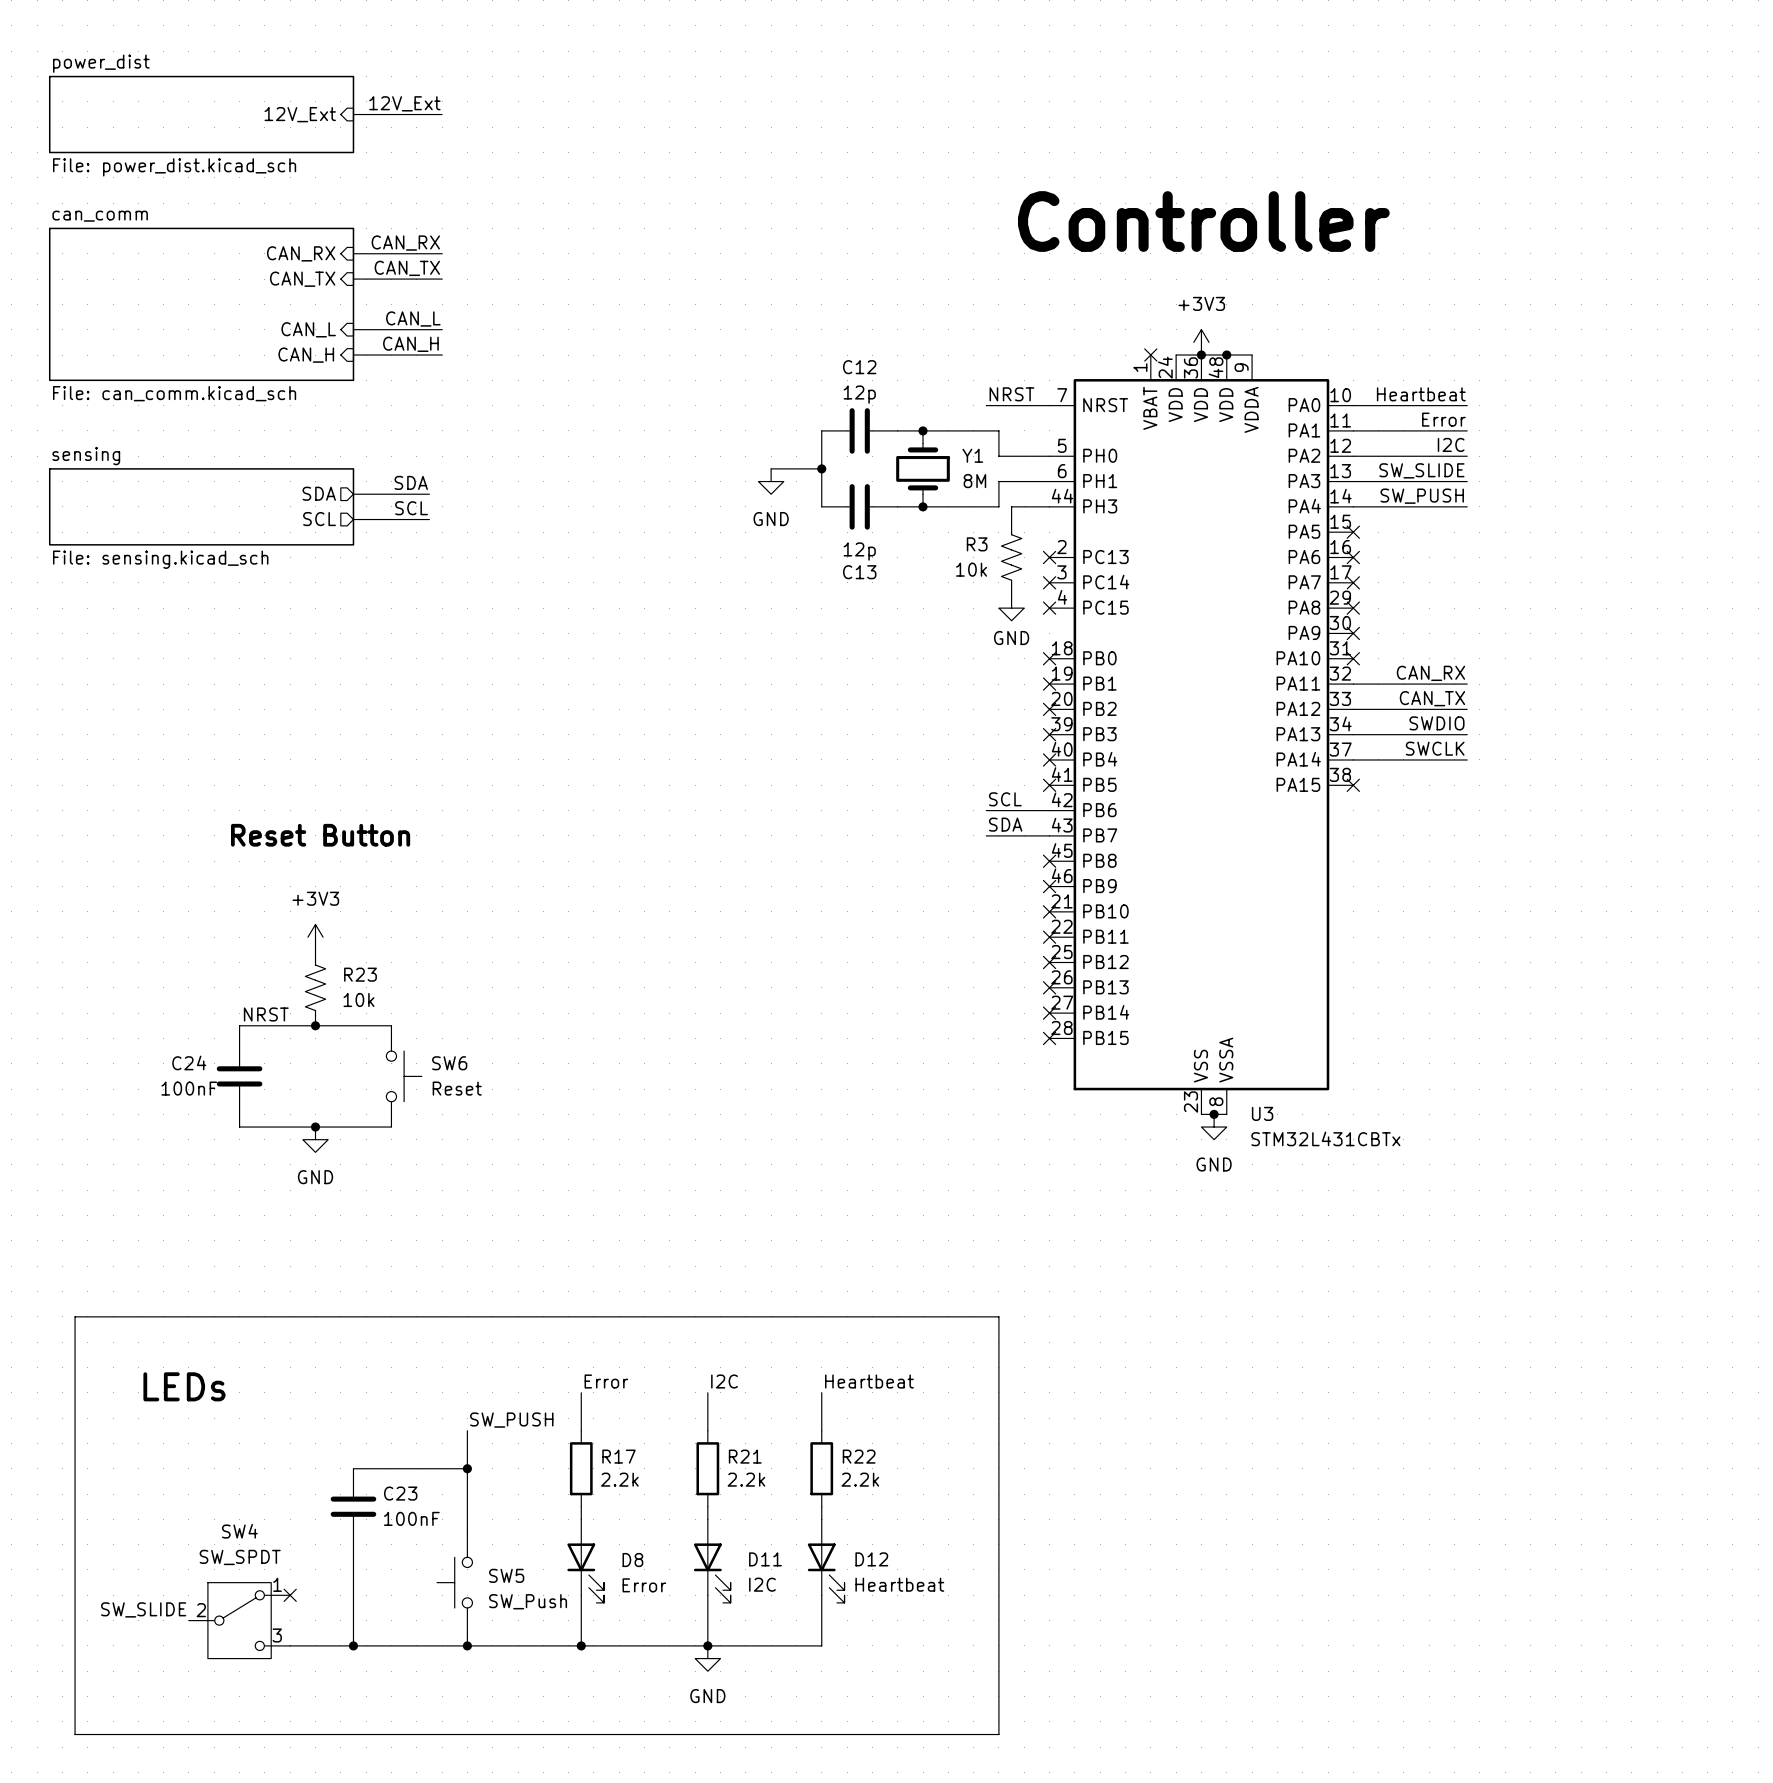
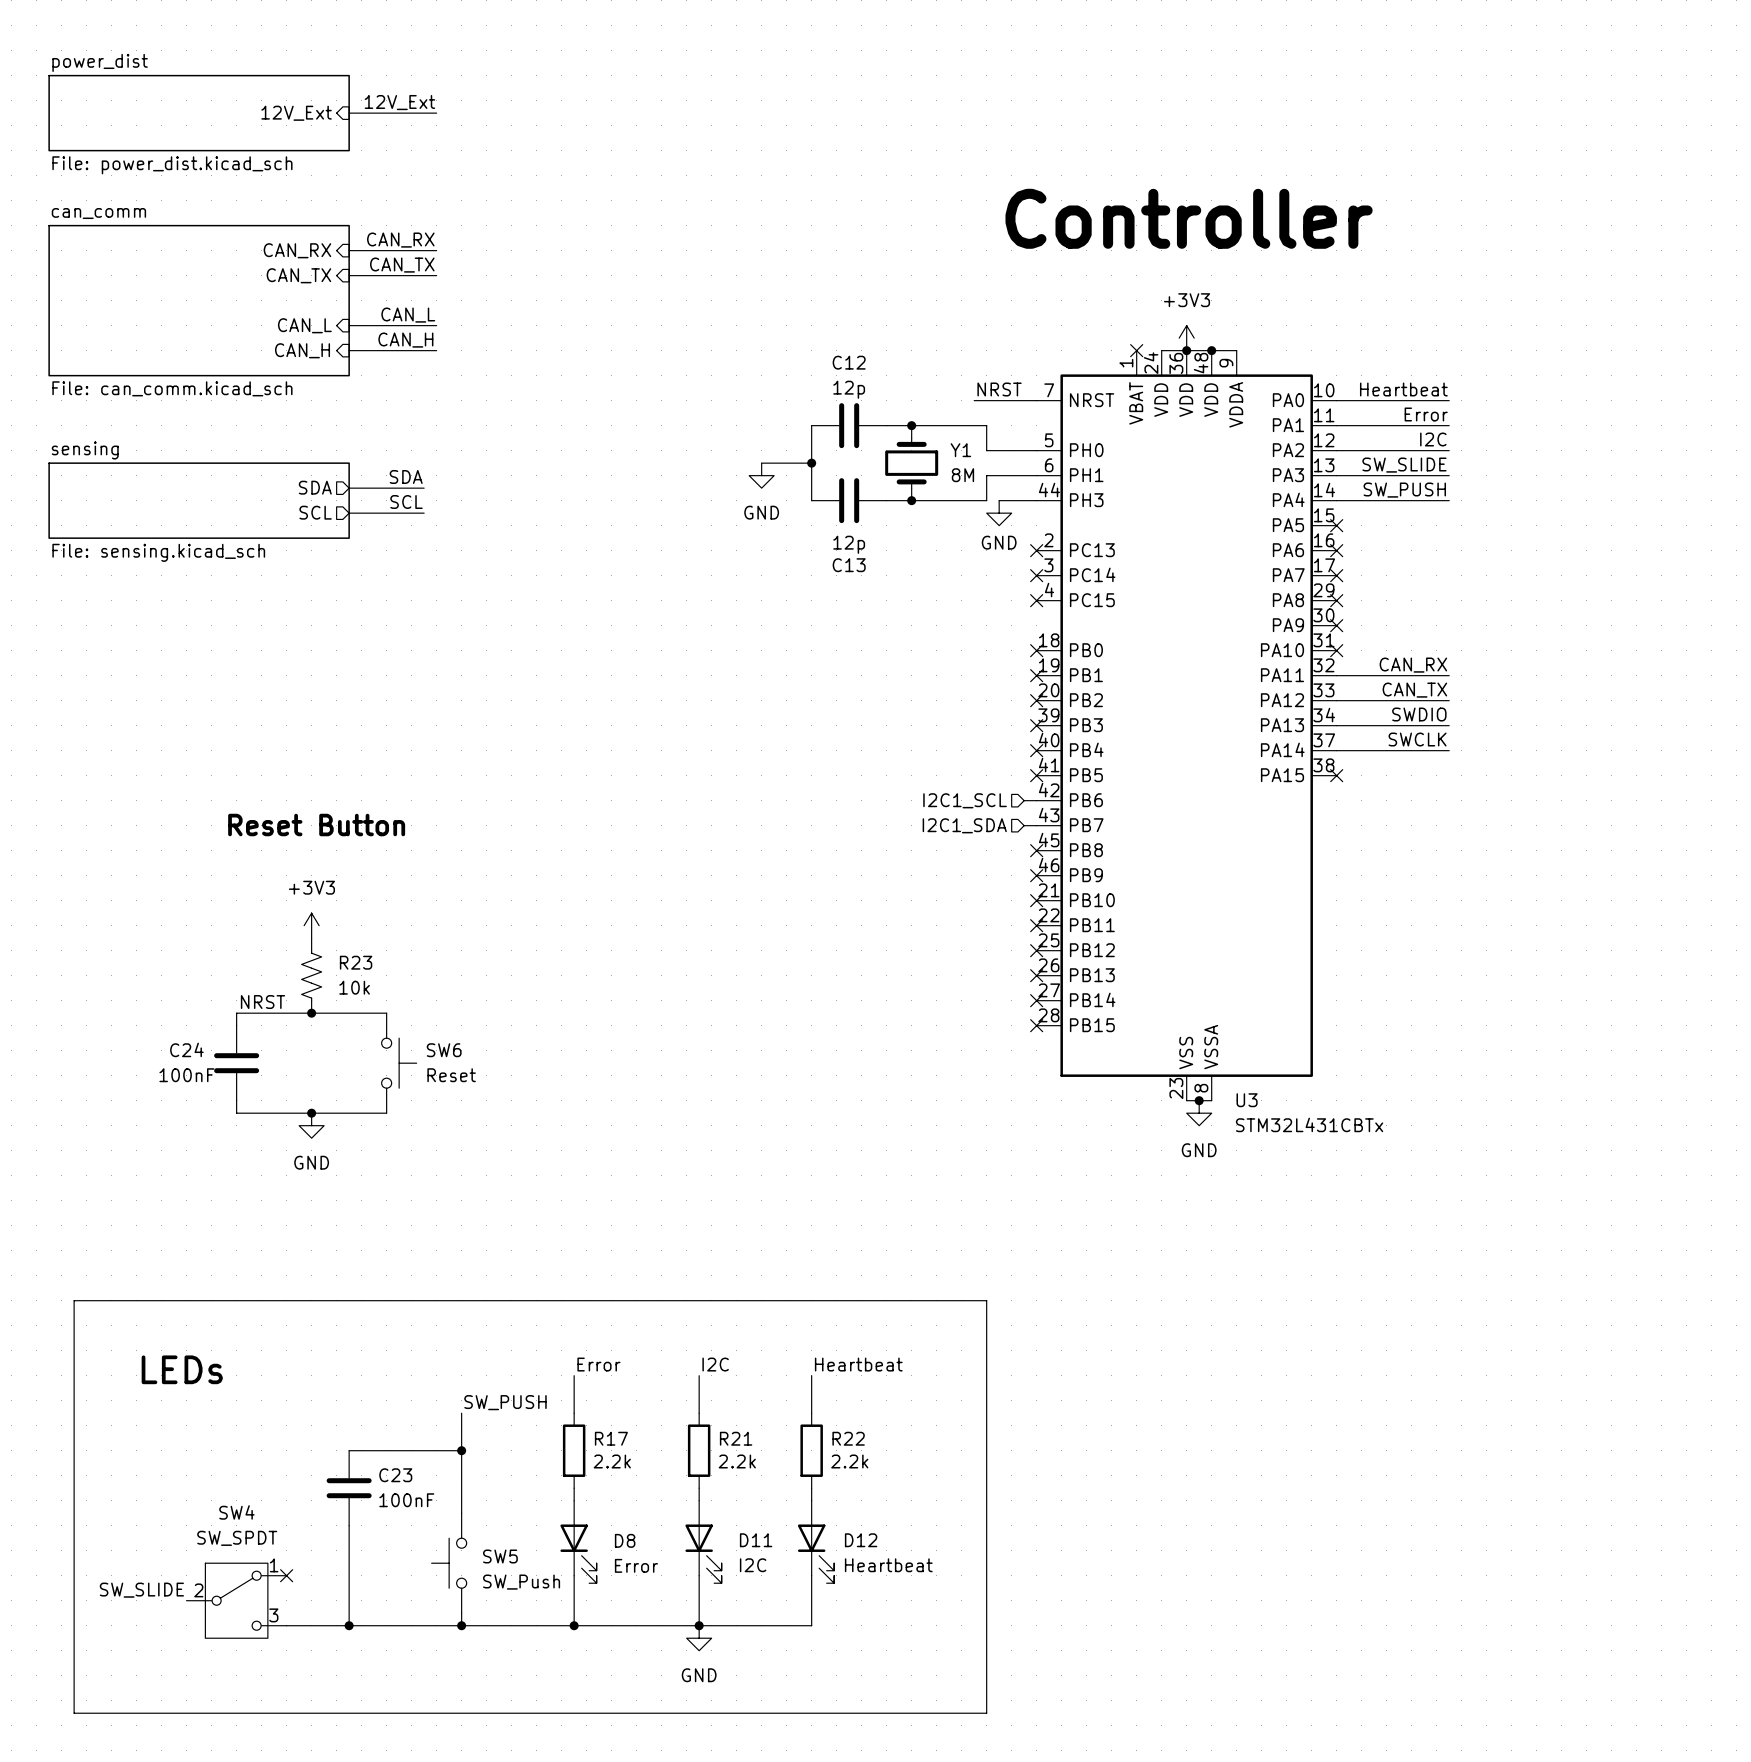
R3: 10k (1011, 557) -> none
power symbol position: GND (1011, 608) -> GND (999, 513)
label: SCL (1005, 799) -> none
hierarchical label: none -> I2C1_SCL (965, 800)
wire: (986, 810) (1036, 810) -> none
label: SDA (1005, 824) -> none
wire: (986, 835) (1036, 835) -> none
hierarchical label: none -> I2C1_SDA (964, 825)

